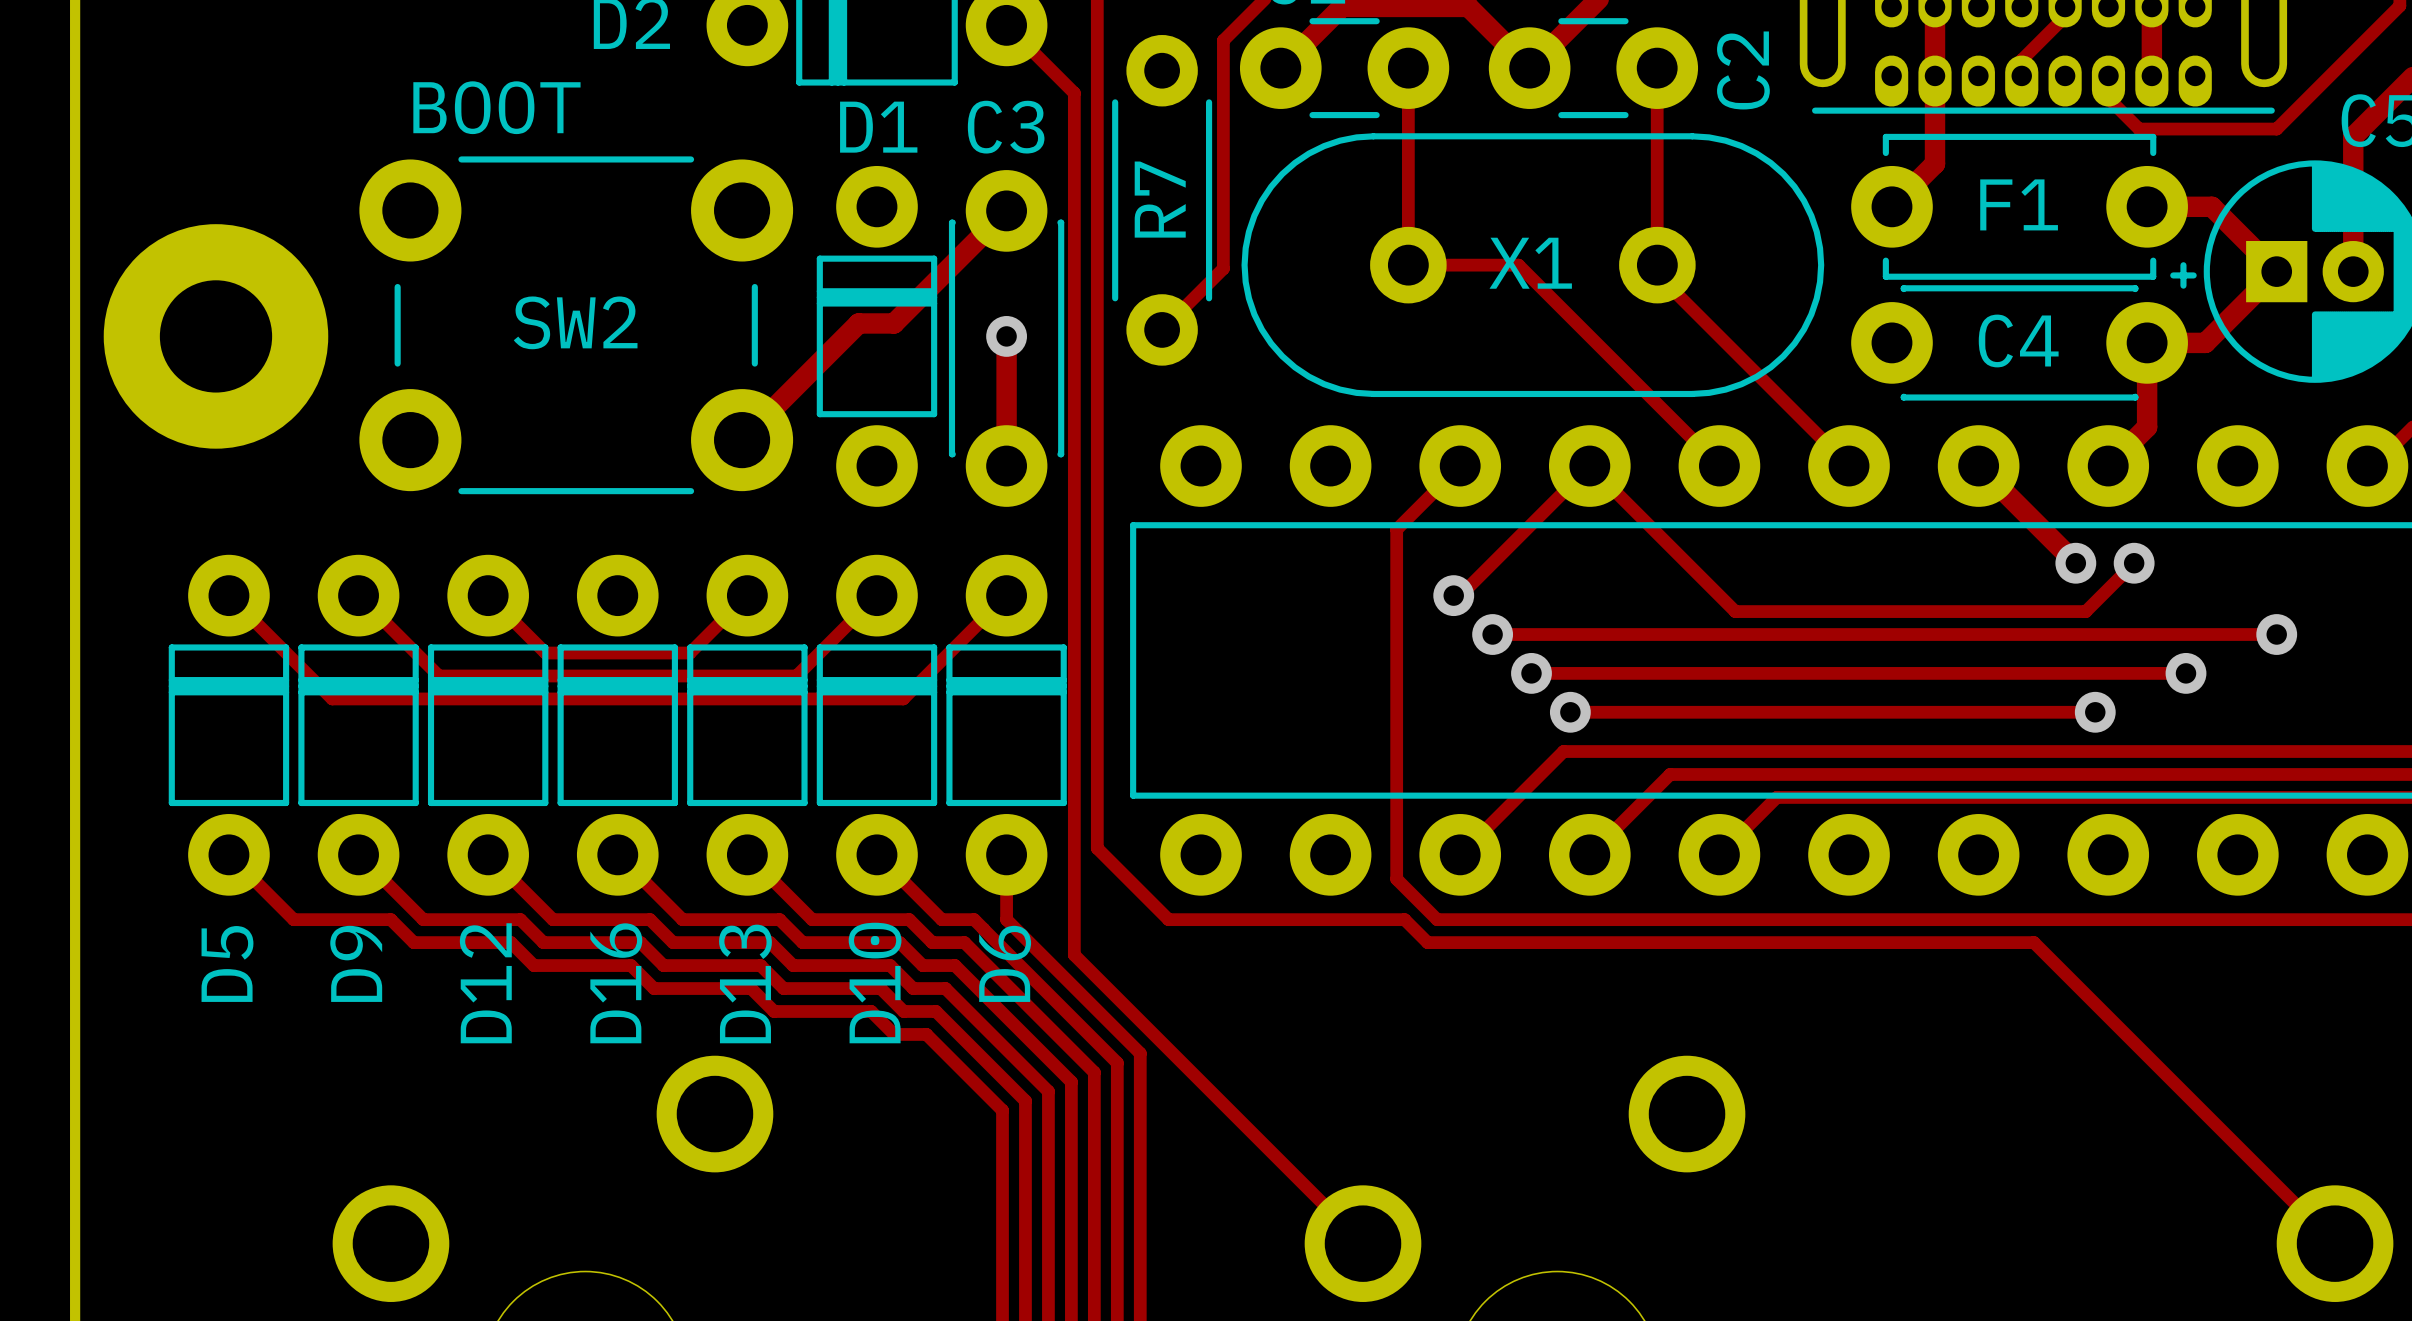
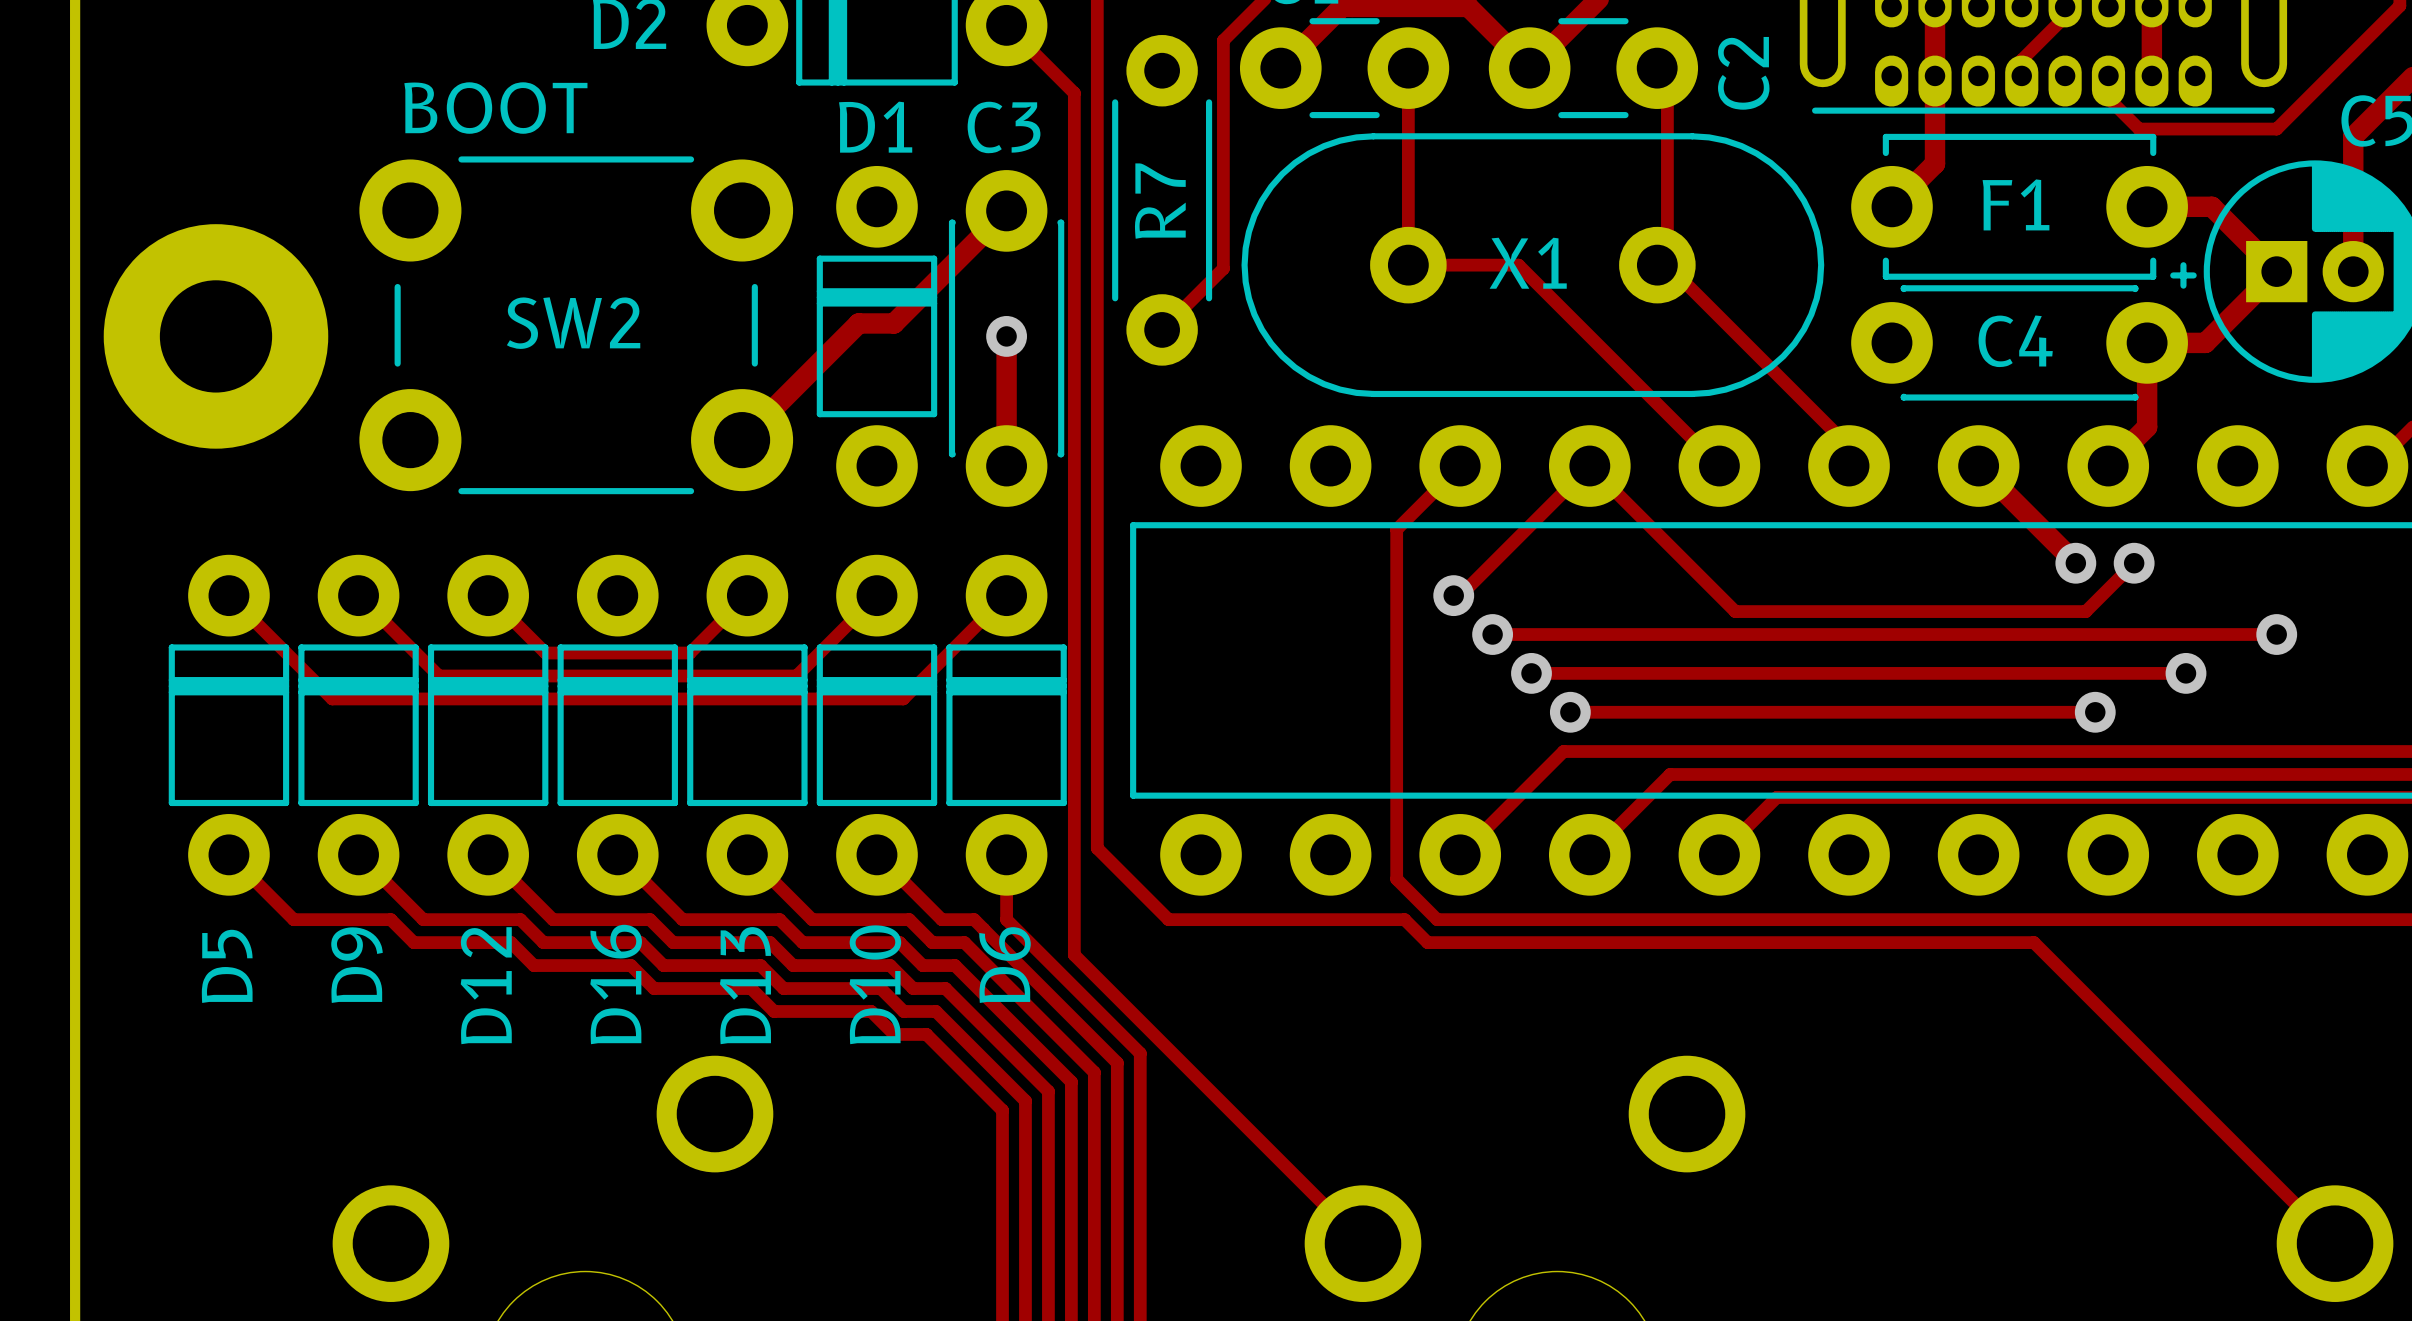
track: (1657, 68) (1657, 274) (1849, 466) -> (1667, 68) (1667, 264) (1849, 446) (1849, 466)

